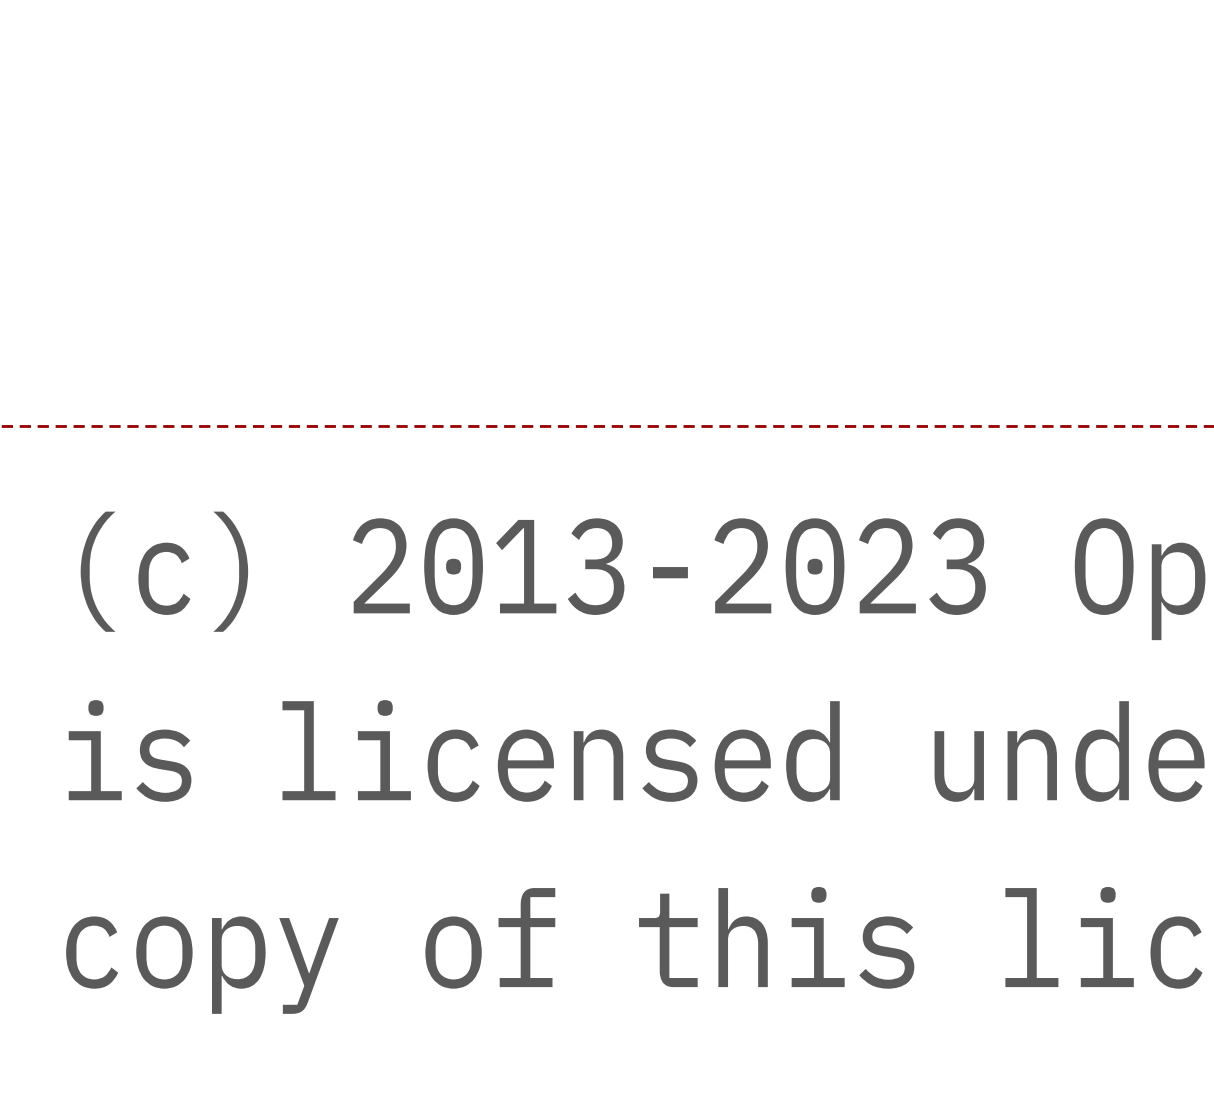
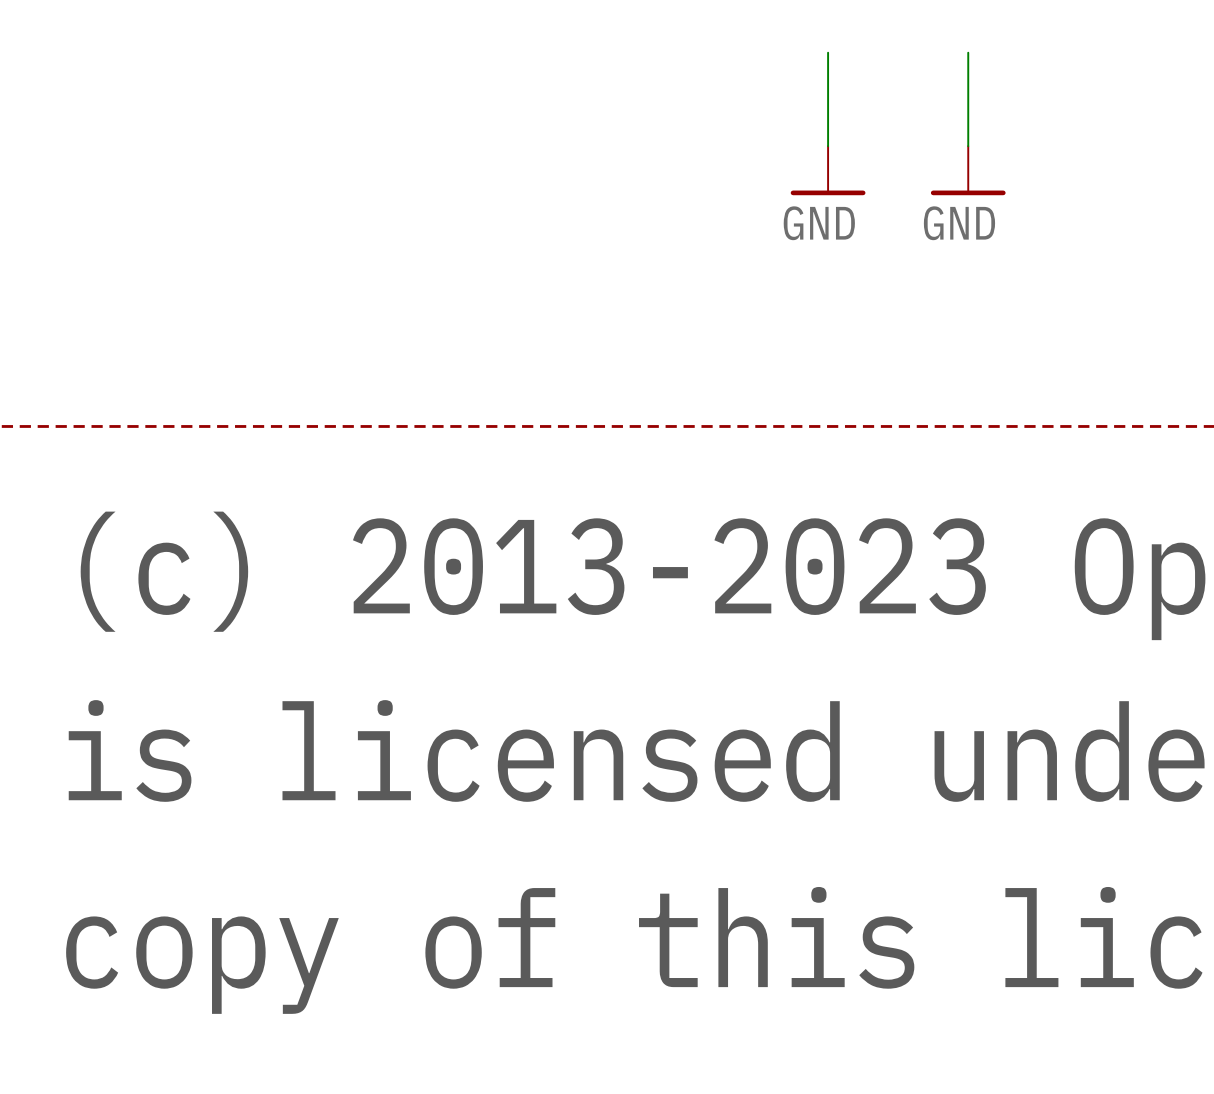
wire: none -> (828, 52) (828, 146)
wire: none -> (968, 52) (968, 146)
power symbol: none -> GND (828, 170)
power symbol: none -> GND (968, 170)

